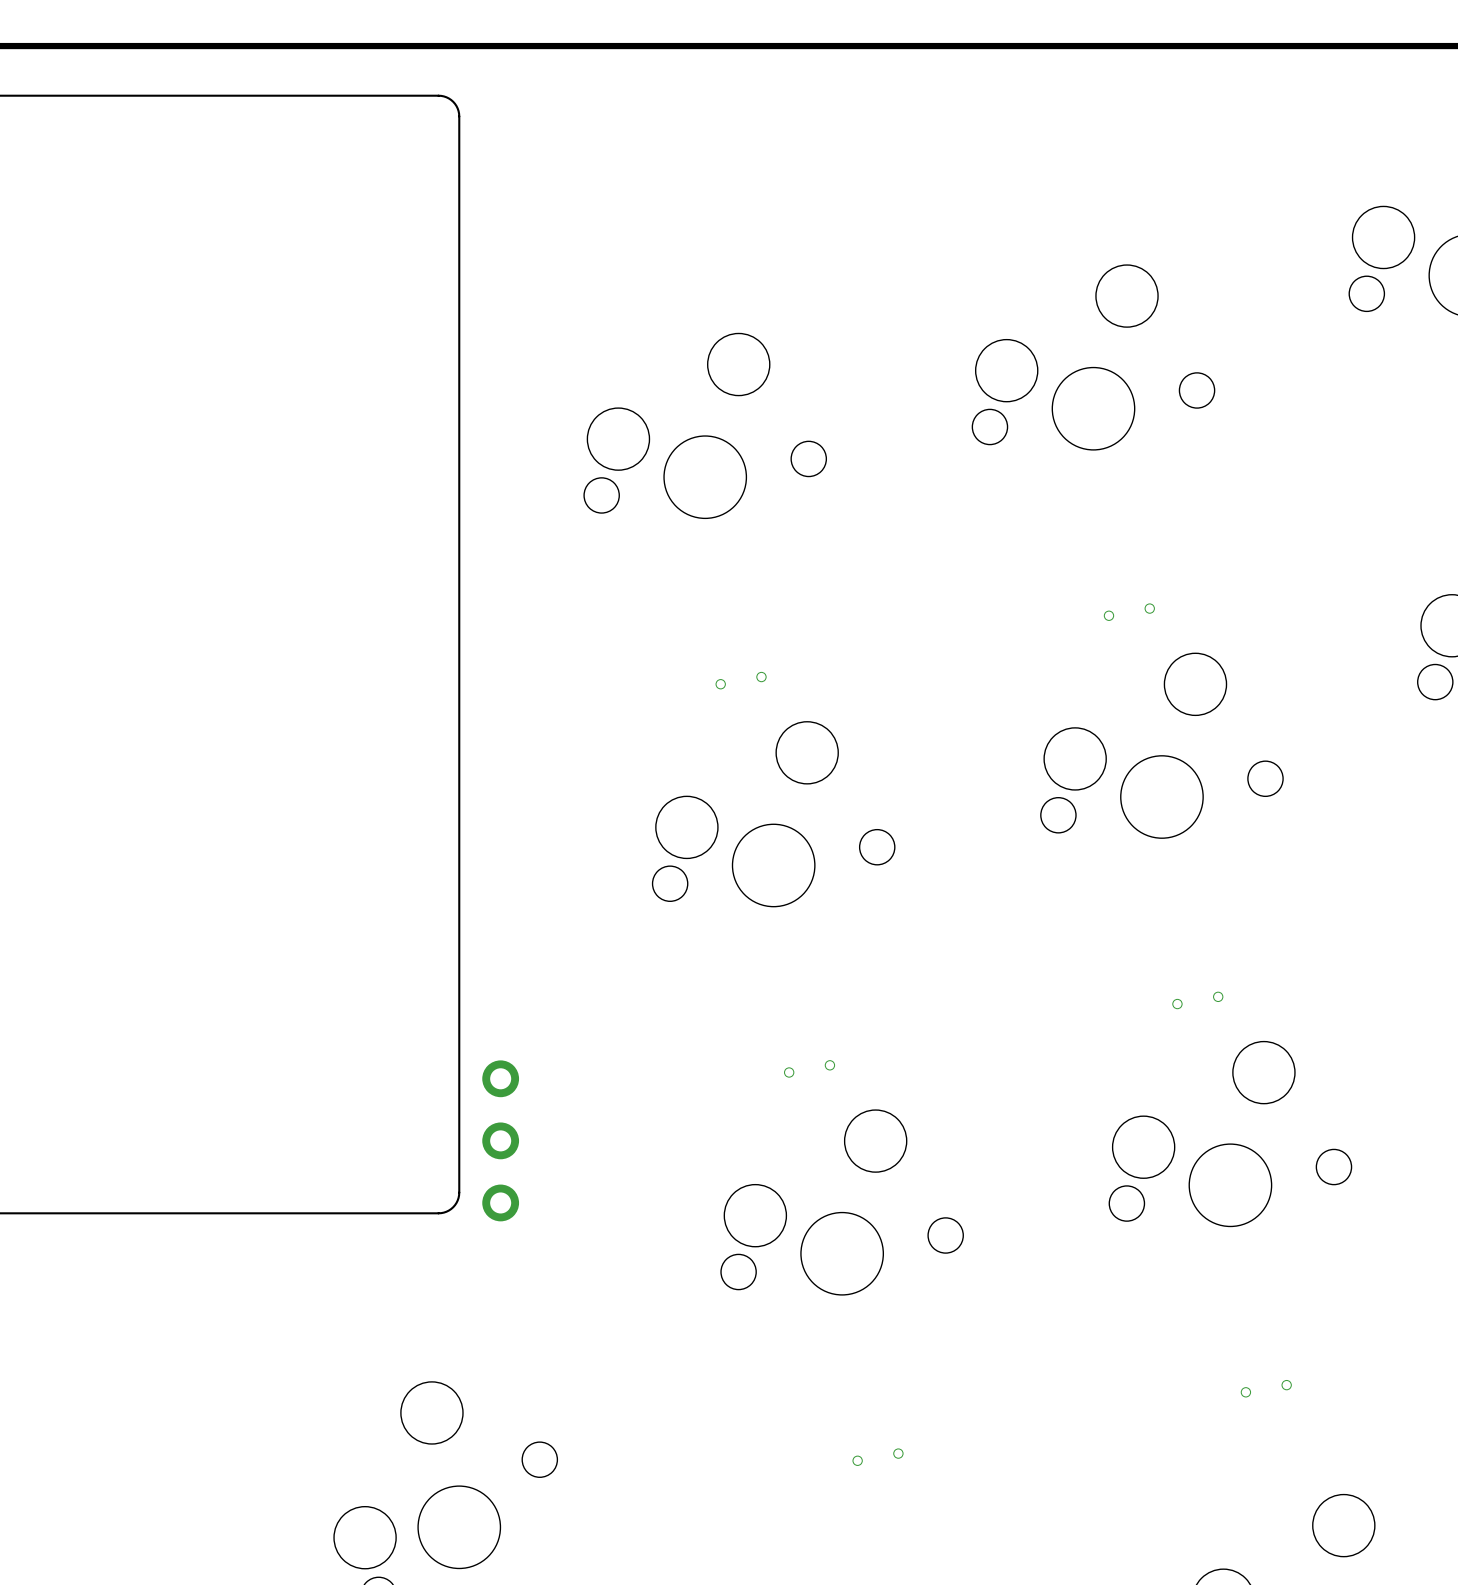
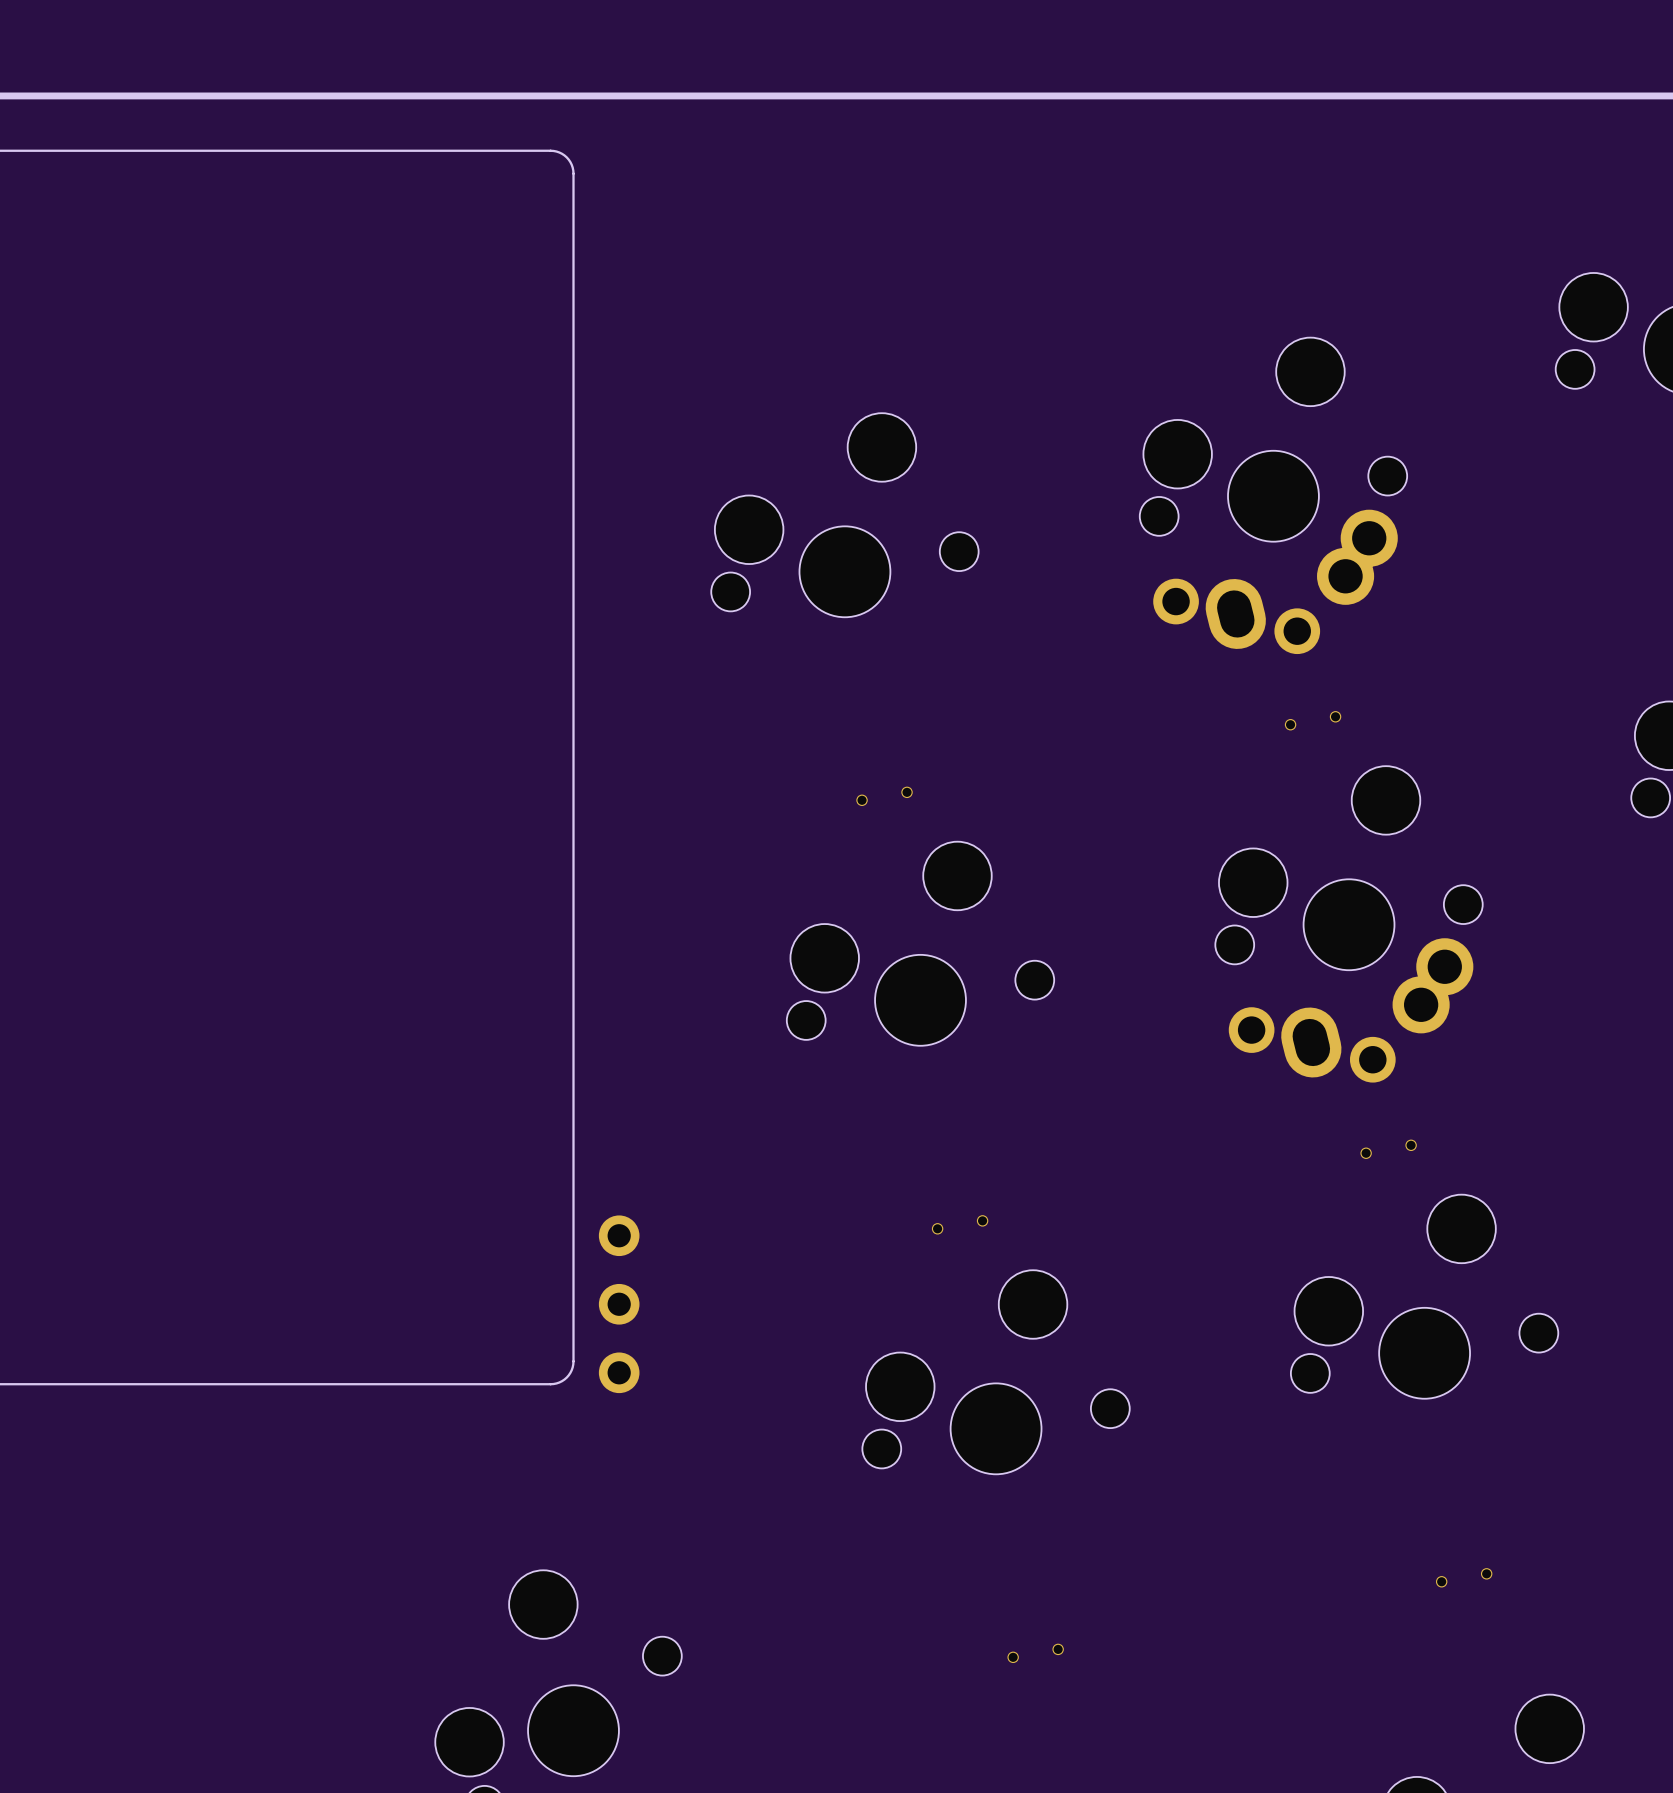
part: none -> (1273, 495)
part: none -> (1349, 924)

